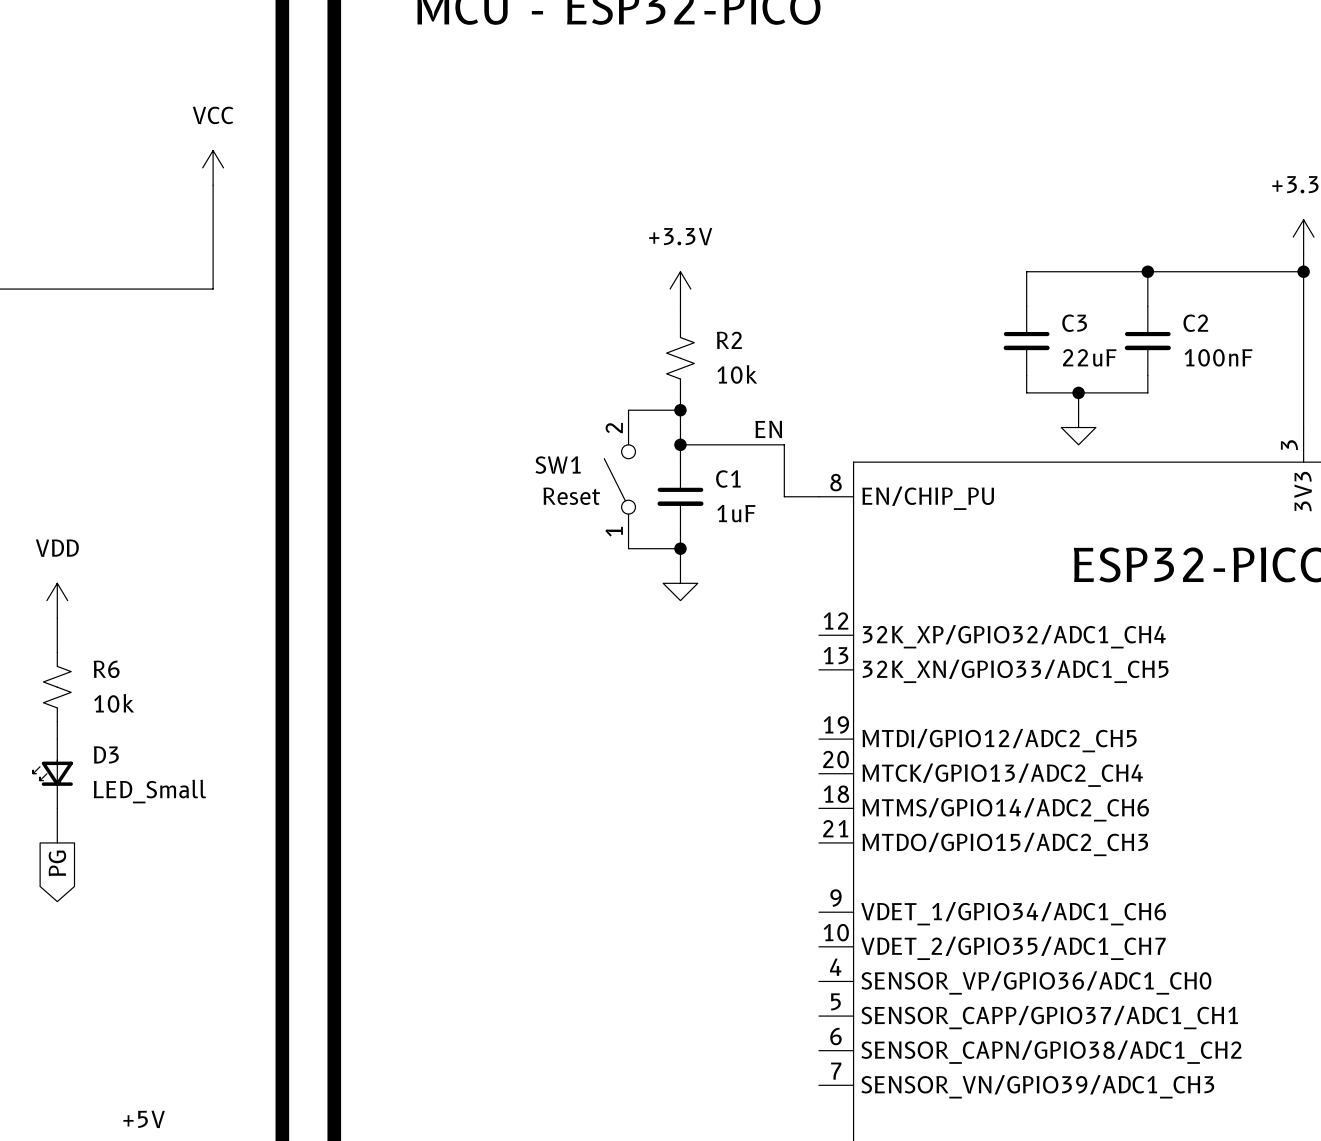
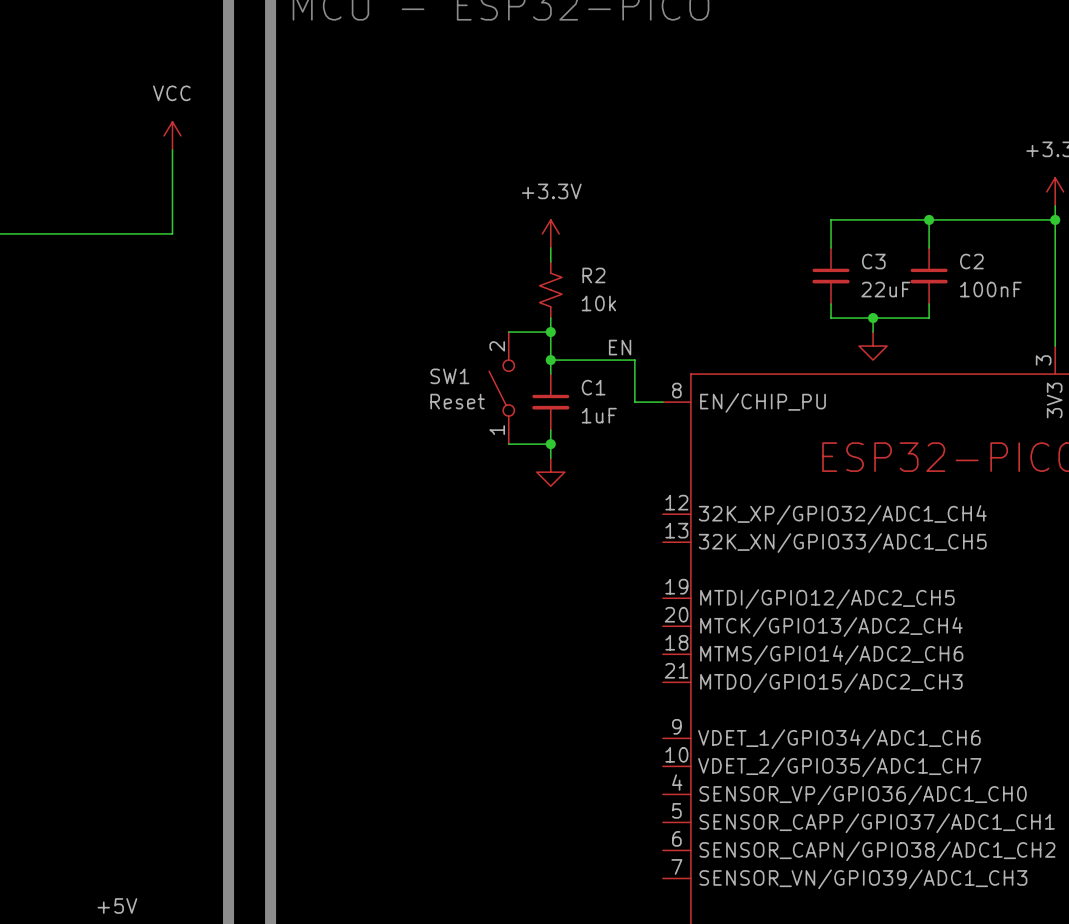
power symbol: VDD (57, 600) -> none
wire: (57, 617) (57, 652) -> none
R6: 10k (57, 687) -> none
wire: (57, 721) (57, 739) -> none
D3: LED_Small (52, 773) -> none
wire: (57, 808) (57, 842) -> none
global label: PG (57, 863) -> none

